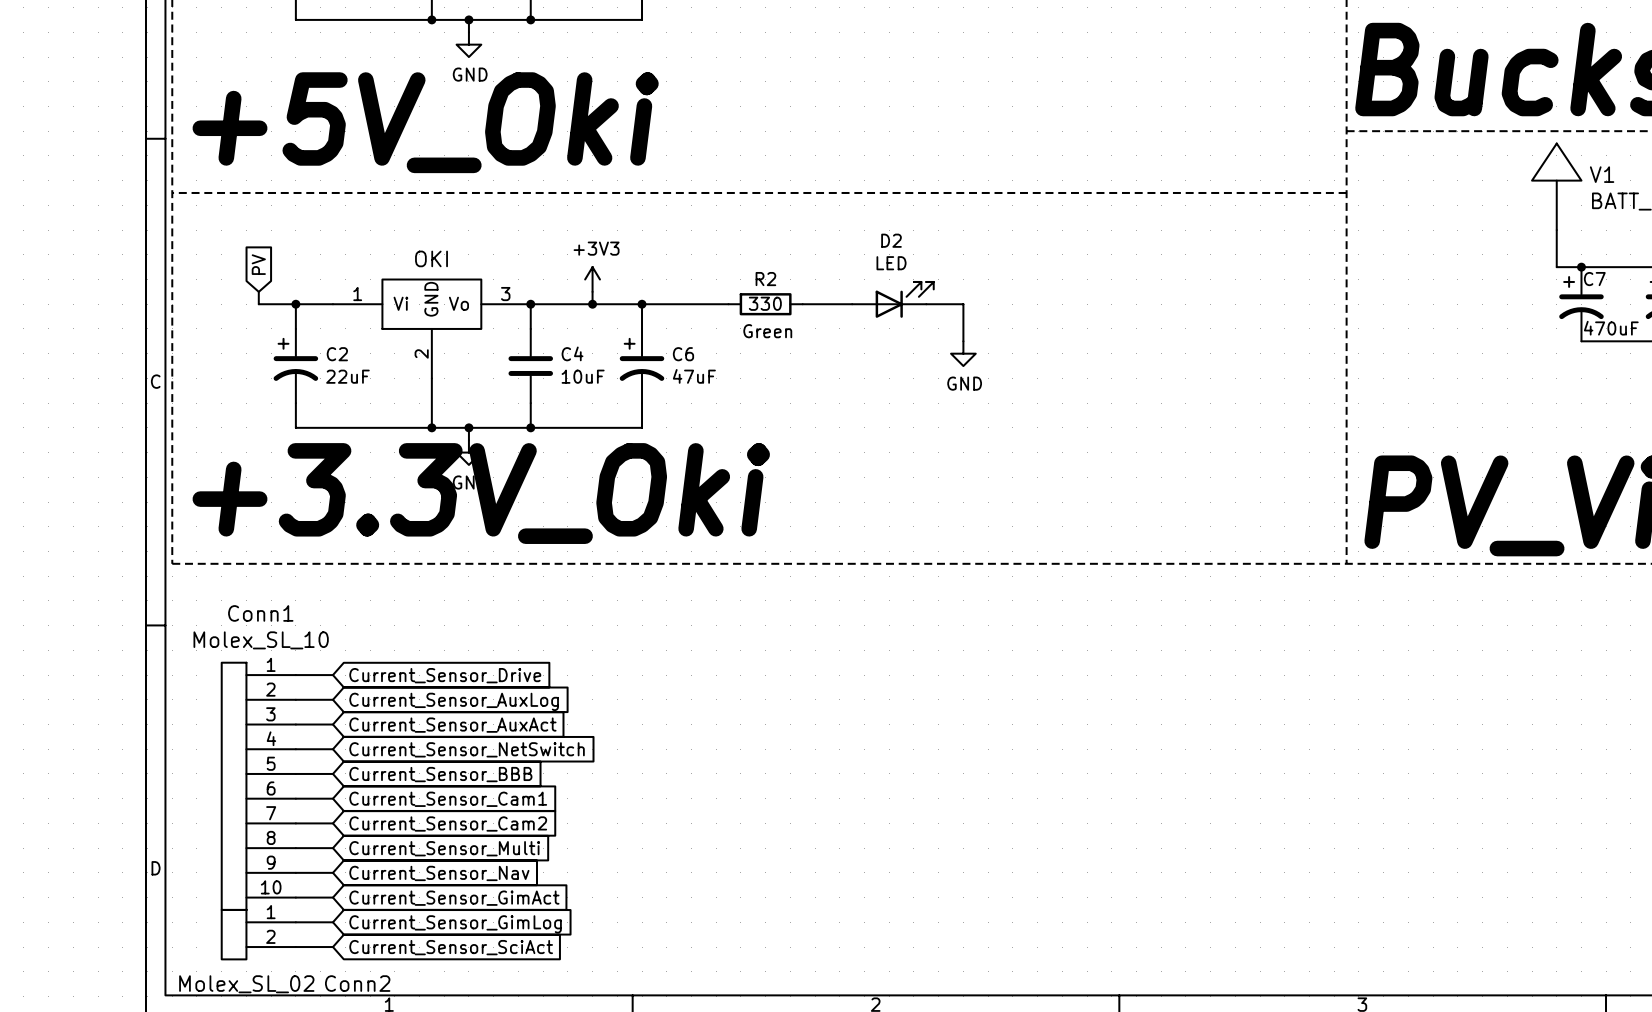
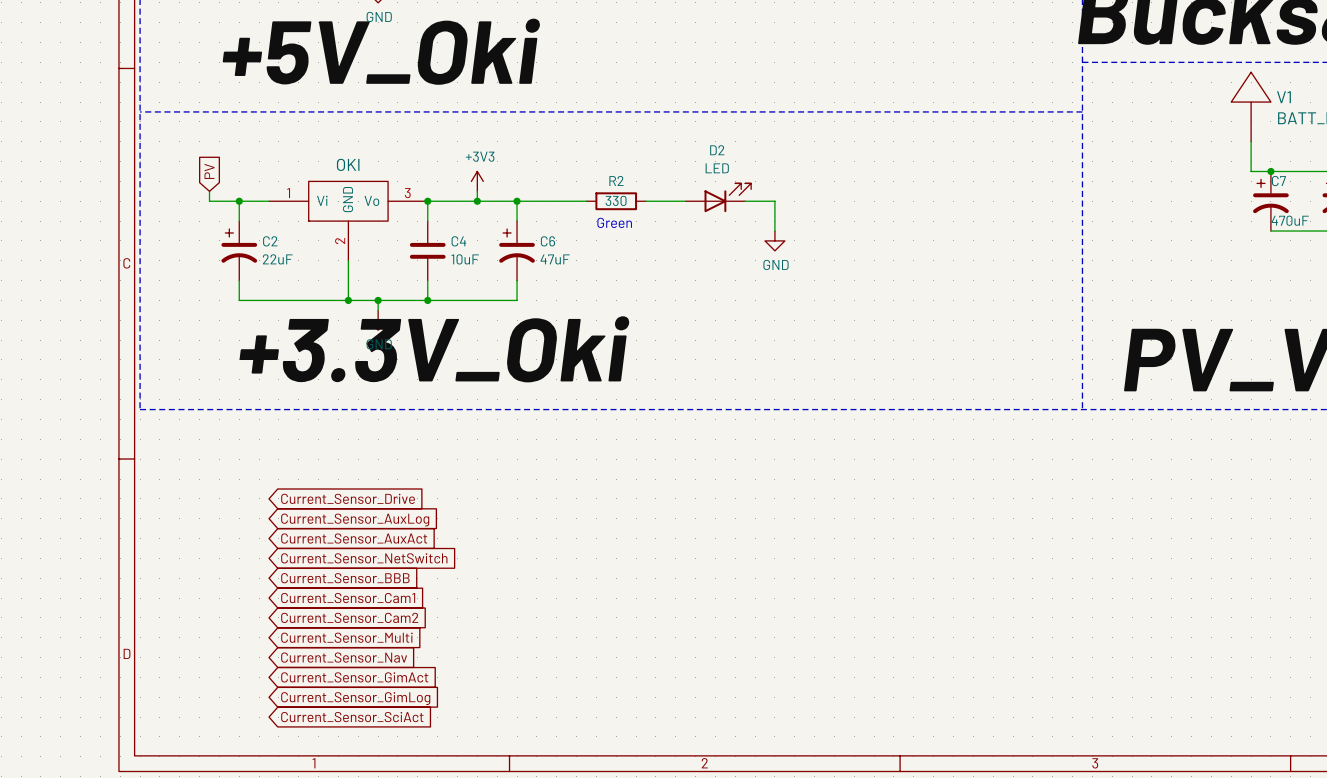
wire: (295, 675) (332, 675) -> none
wire: (295, 699) (332, 699) -> none
wire: (295, 724) (332, 724) -> none
wire: (295, 749) (332, 749) -> none
wire: (295, 773) (332, 773) -> none
Conn1: Molex_SL_10 (258, 786) -> none
wire: (295, 798) (332, 798) -> none
wire: (295, 823) (332, 823) -> none
wire: (295, 848) (332, 848) -> none
wire: (295, 872) (332, 872) -> none
wire: (295, 897) (332, 897) -> none
wire: (295, 922) (332, 922) -> none
Conn2: Molex_SL_02 (258, 934) -> none
wire: (295, 947) (332, 947) -> none

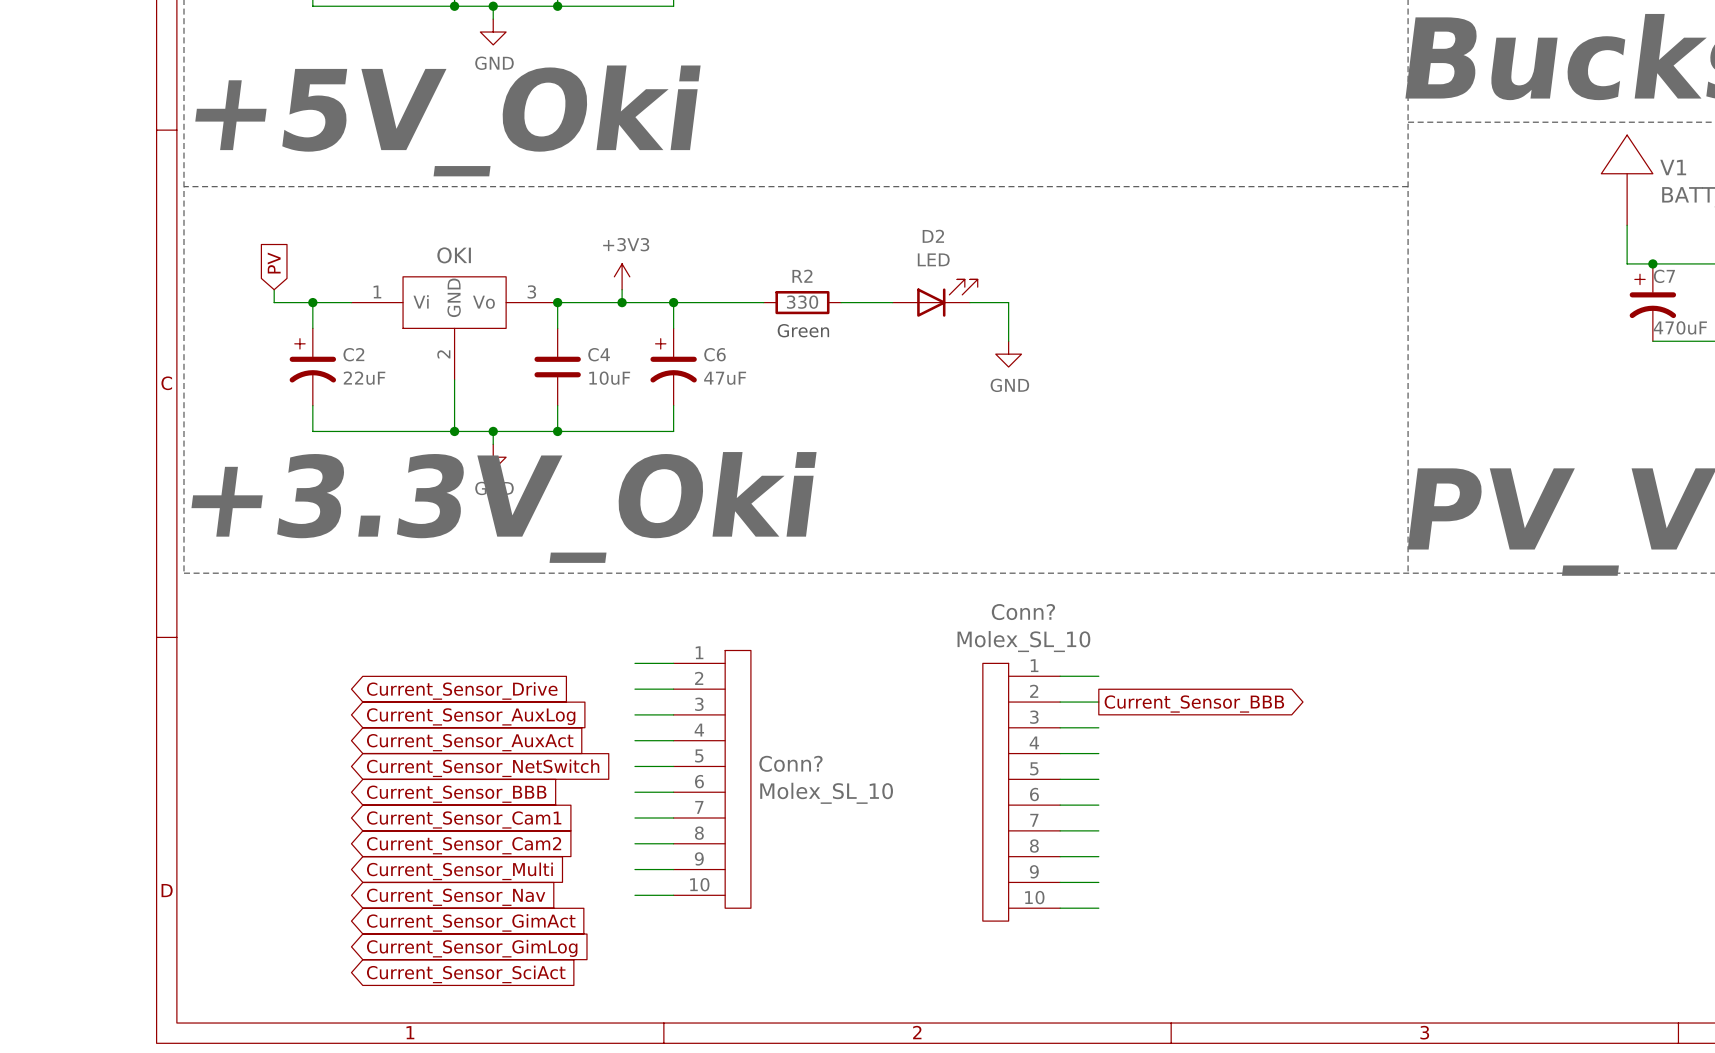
wire: none -> (634, 663) (673, 663)
wire: none -> (1060, 676) (1098, 676)
wire: none -> (634, 689) (673, 689)
wire: none -> (1060, 702) (1098, 702)
global label: none -> Current_Sensor_BBB (1194, 704)
wire: none -> (634, 714) (673, 714)
wire: none -> (1060, 727) (1098, 727)
wire: none -> (634, 740) (673, 740)
wire: none -> (1060, 753) (1098, 753)
wire: none -> (634, 766) (673, 766)
Conn?: none -> Molex_SL_10 (712, 779)
wire: none -> (1060, 779) (1098, 779)
wire: none -> (634, 792) (673, 792)
Conn?: none -> Molex_SL_10 (1021, 792)
wire: none -> (1060, 805) (1098, 805)
wire: none -> (634, 818) (673, 818)
wire: none -> (1060, 830) (1098, 830)
wire: none -> (634, 843) (673, 843)
wire: none -> (1060, 856) (1098, 856)
wire: none -> (634, 869) (673, 869)
wire: none -> (1060, 882) (1098, 882)
wire: none -> (634, 895) (673, 895)
wire: none -> (1060, 908) (1098, 908)

